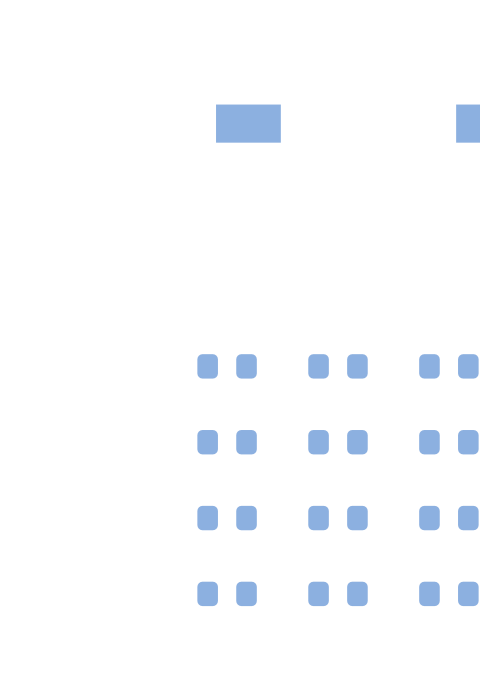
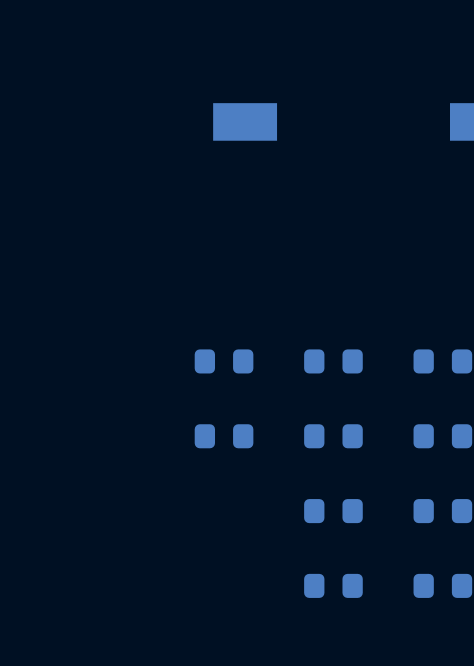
part: (227, 518) -> none
part: (227, 593) -> none

